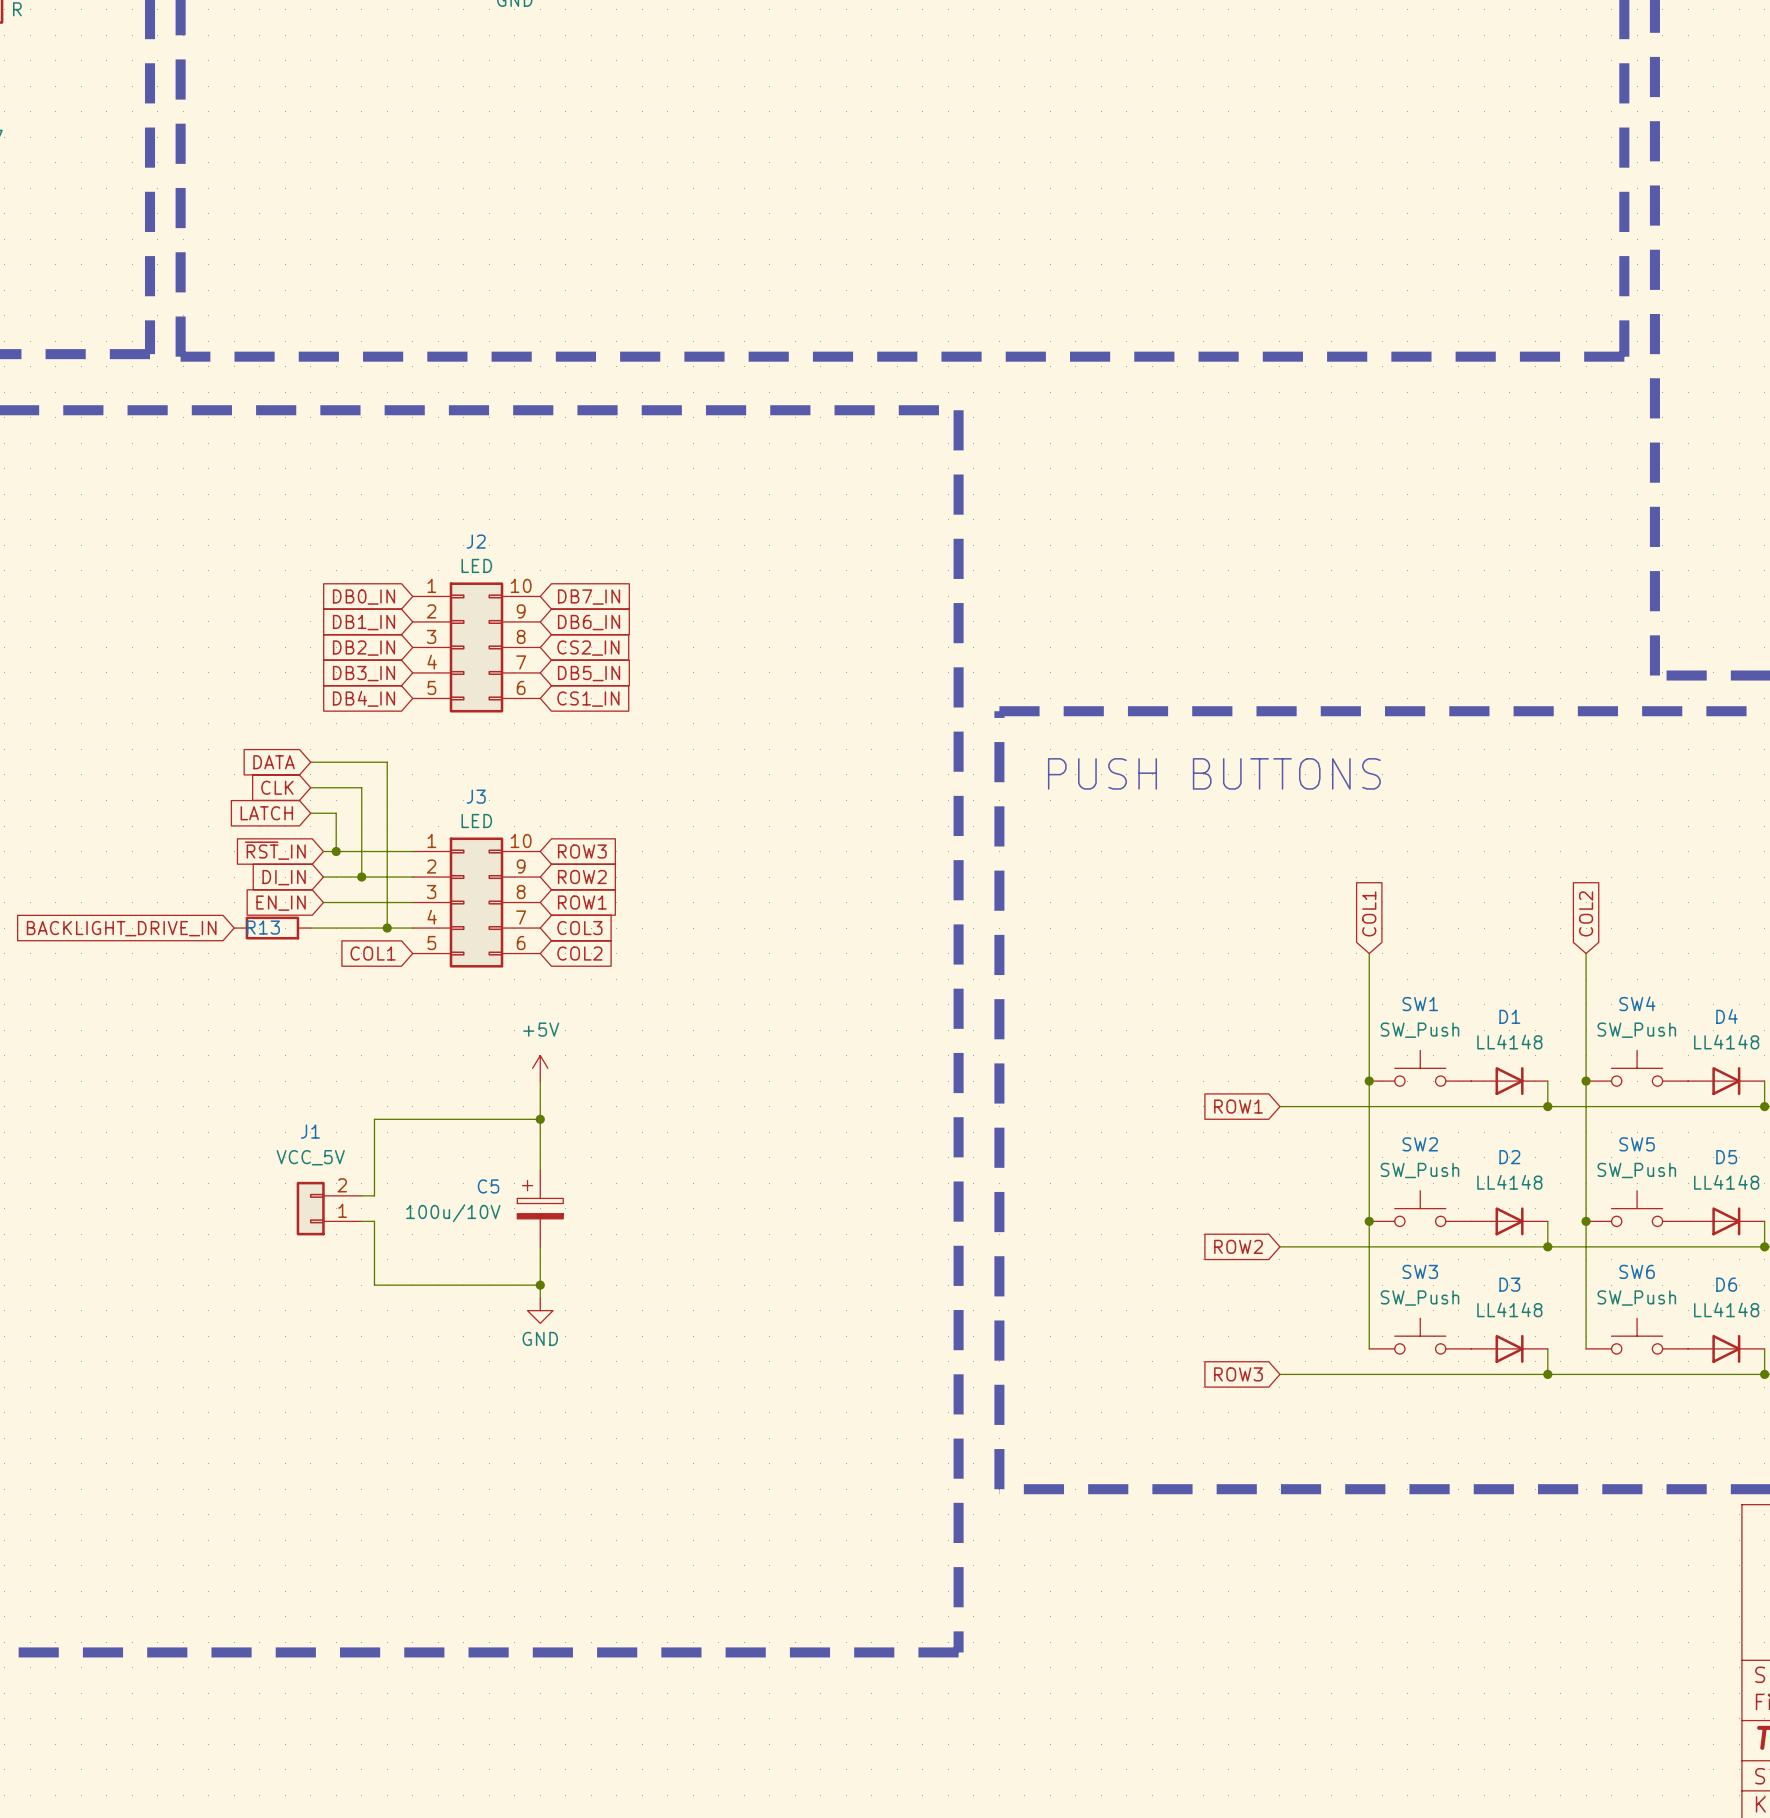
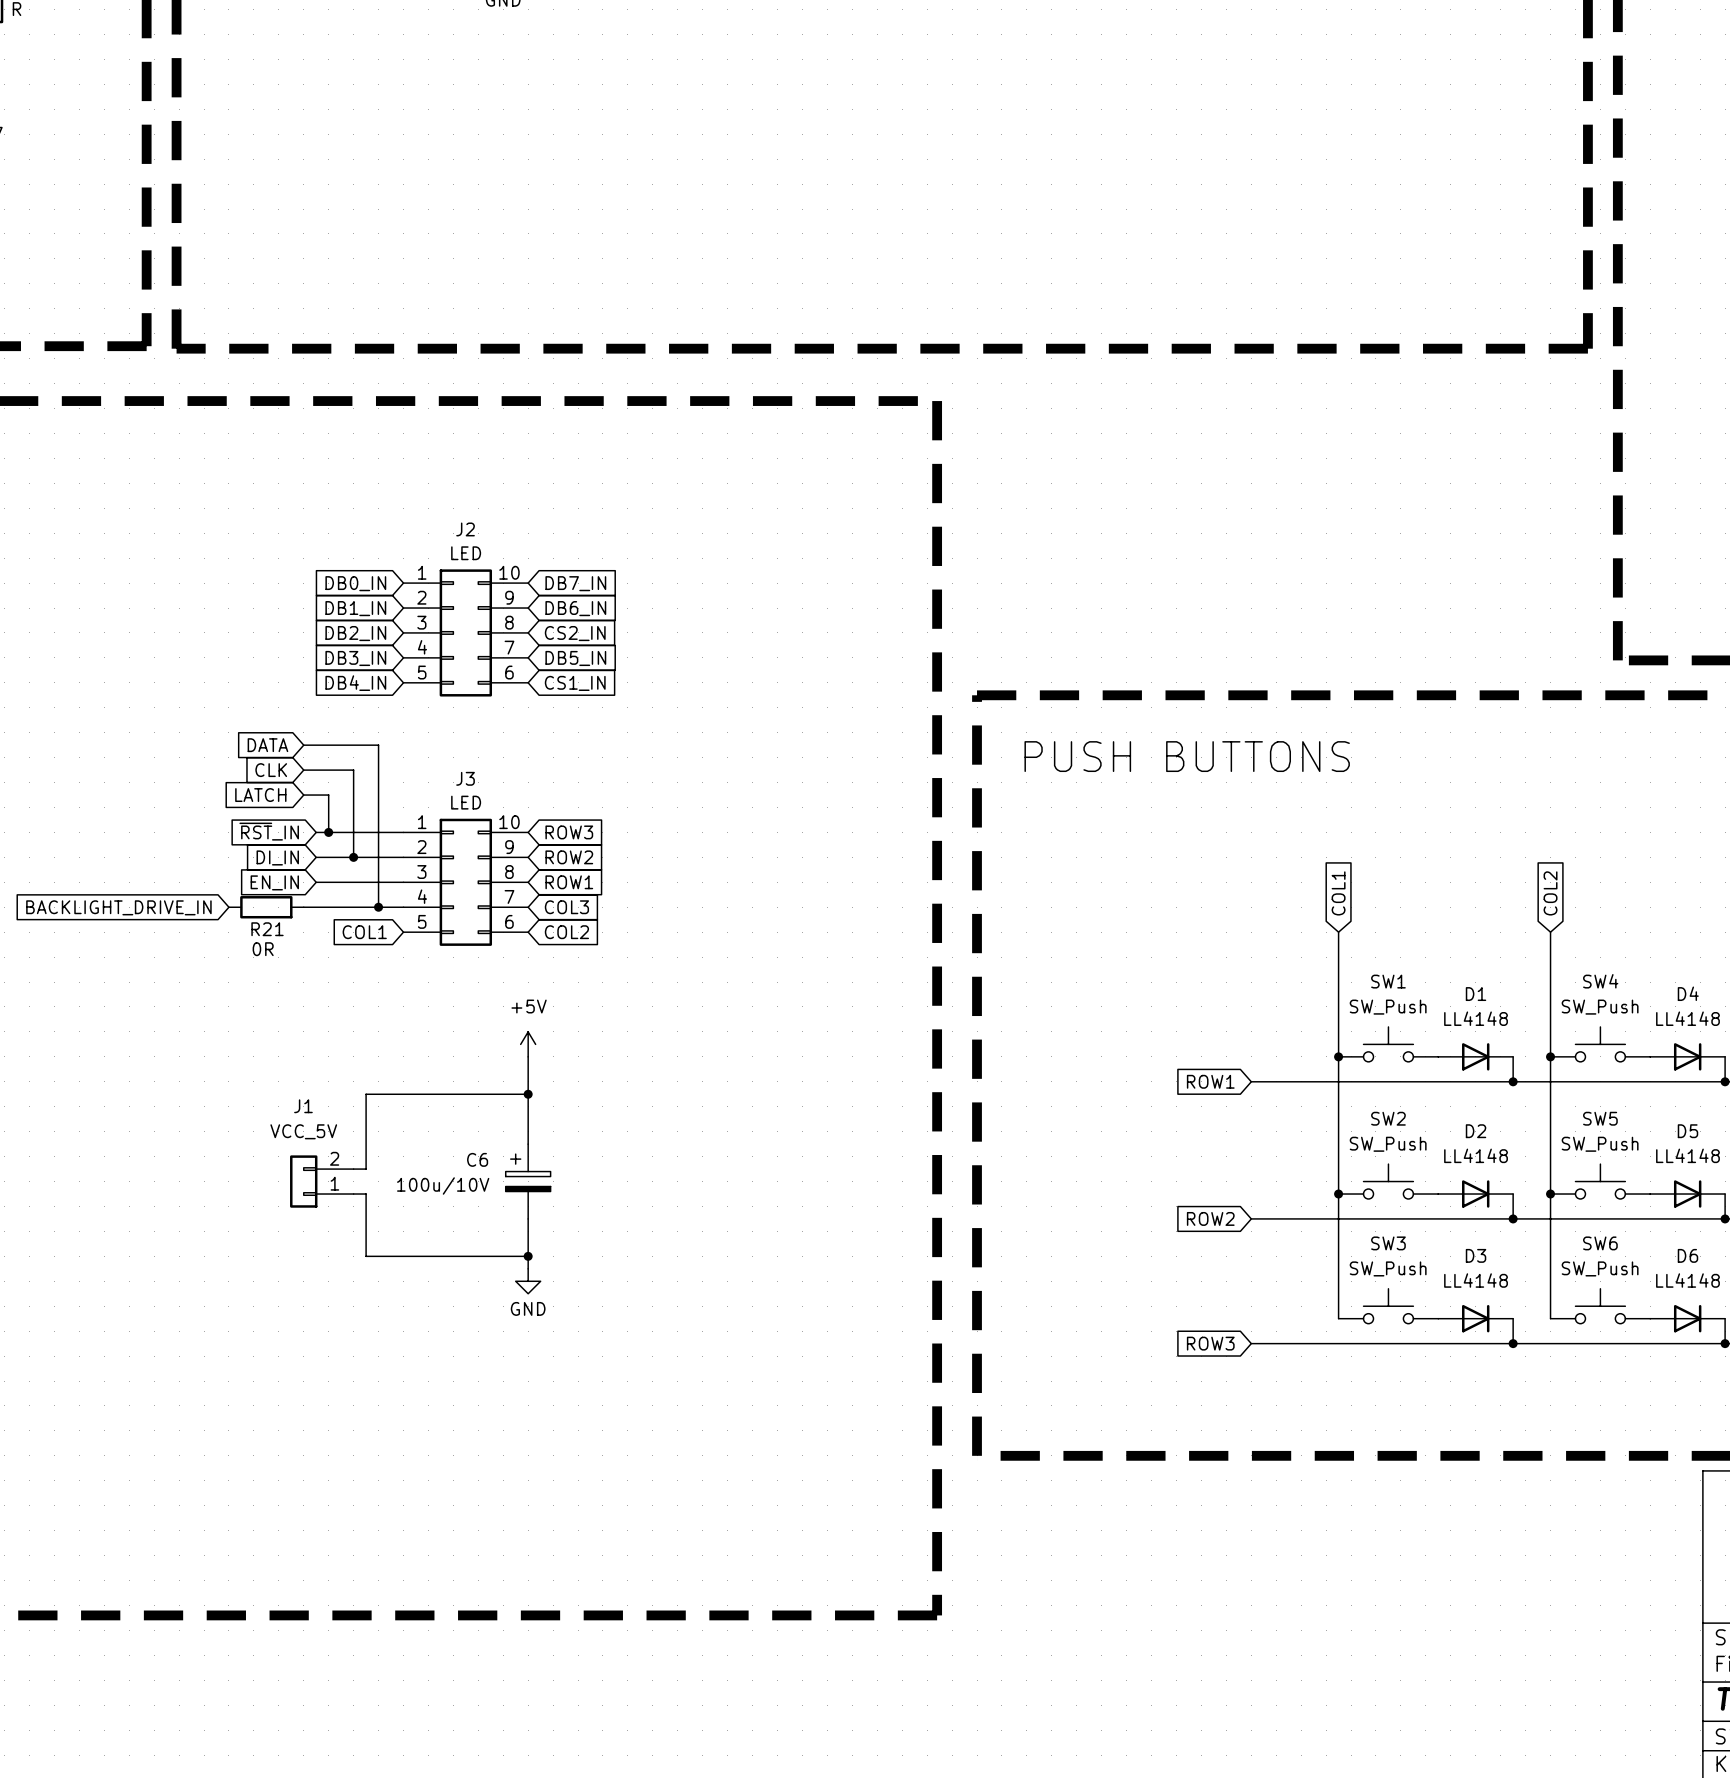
R13 name: R13 (263, 927) -> R21 (267, 929)
R13 value: none -> 0R (263, 949)
C5 name: C5 (488, 1186) -> C6 (477, 1159)

